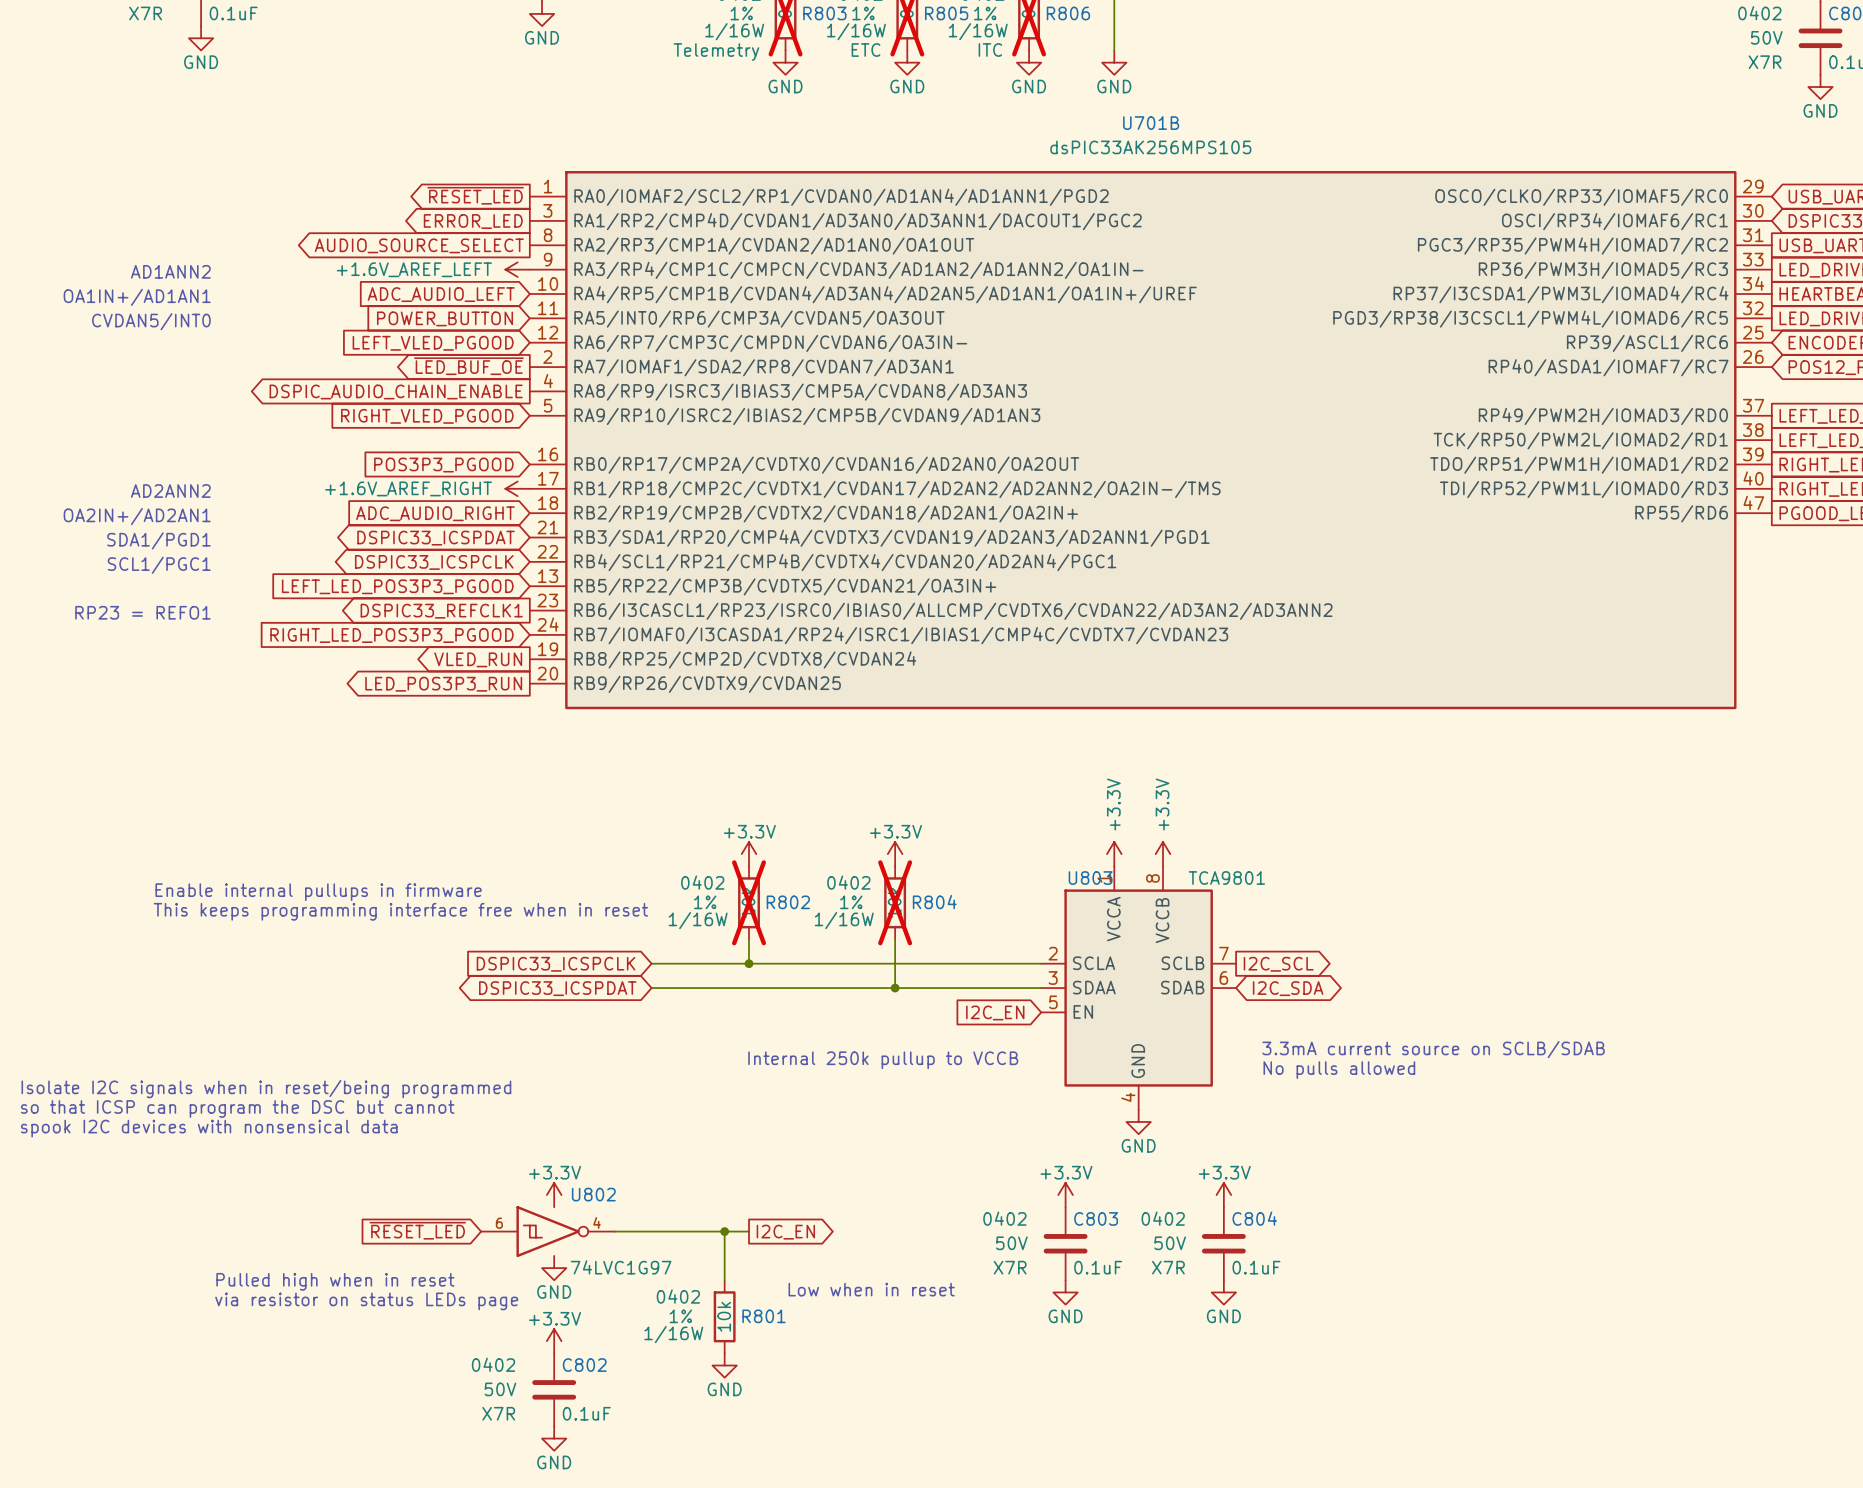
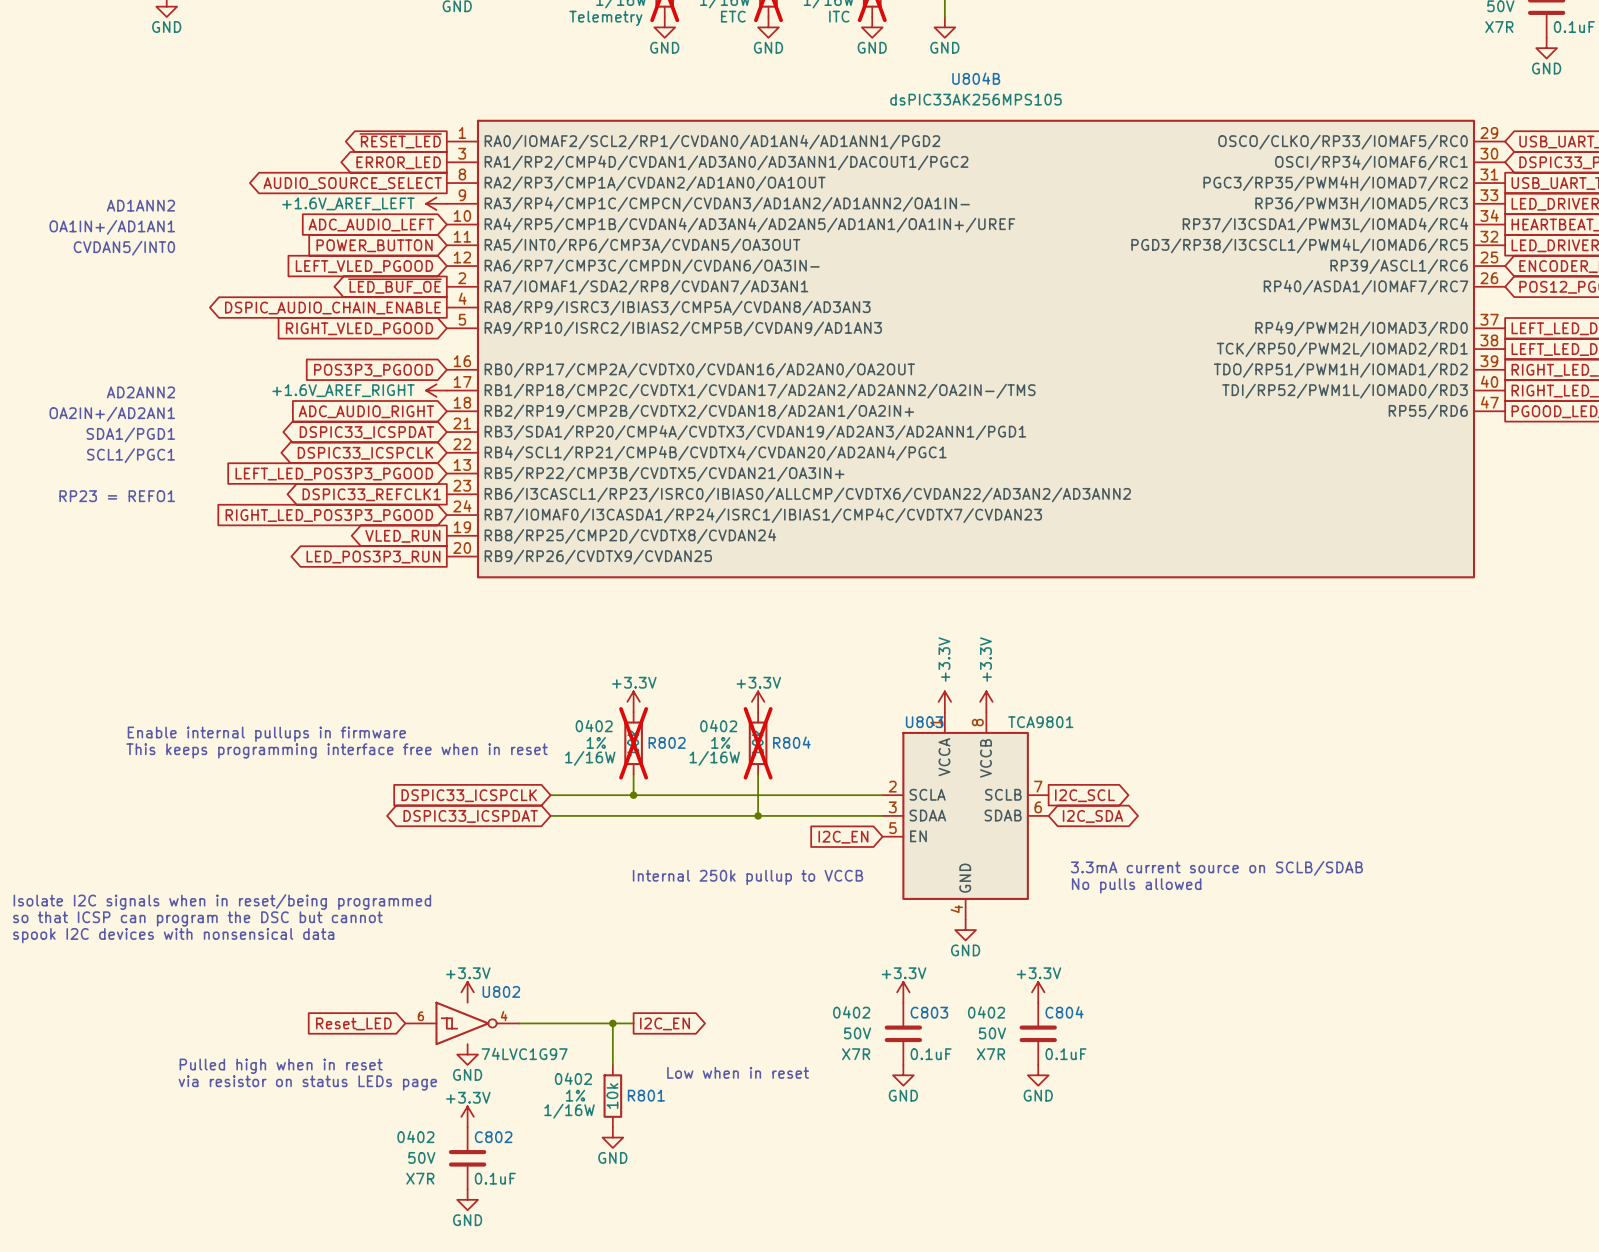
U701B name: U701B (1151, 123) -> U804B (976, 78)
global label: ~{RESET_LED} (417, 1230) -> Reset_LED (353, 1023)

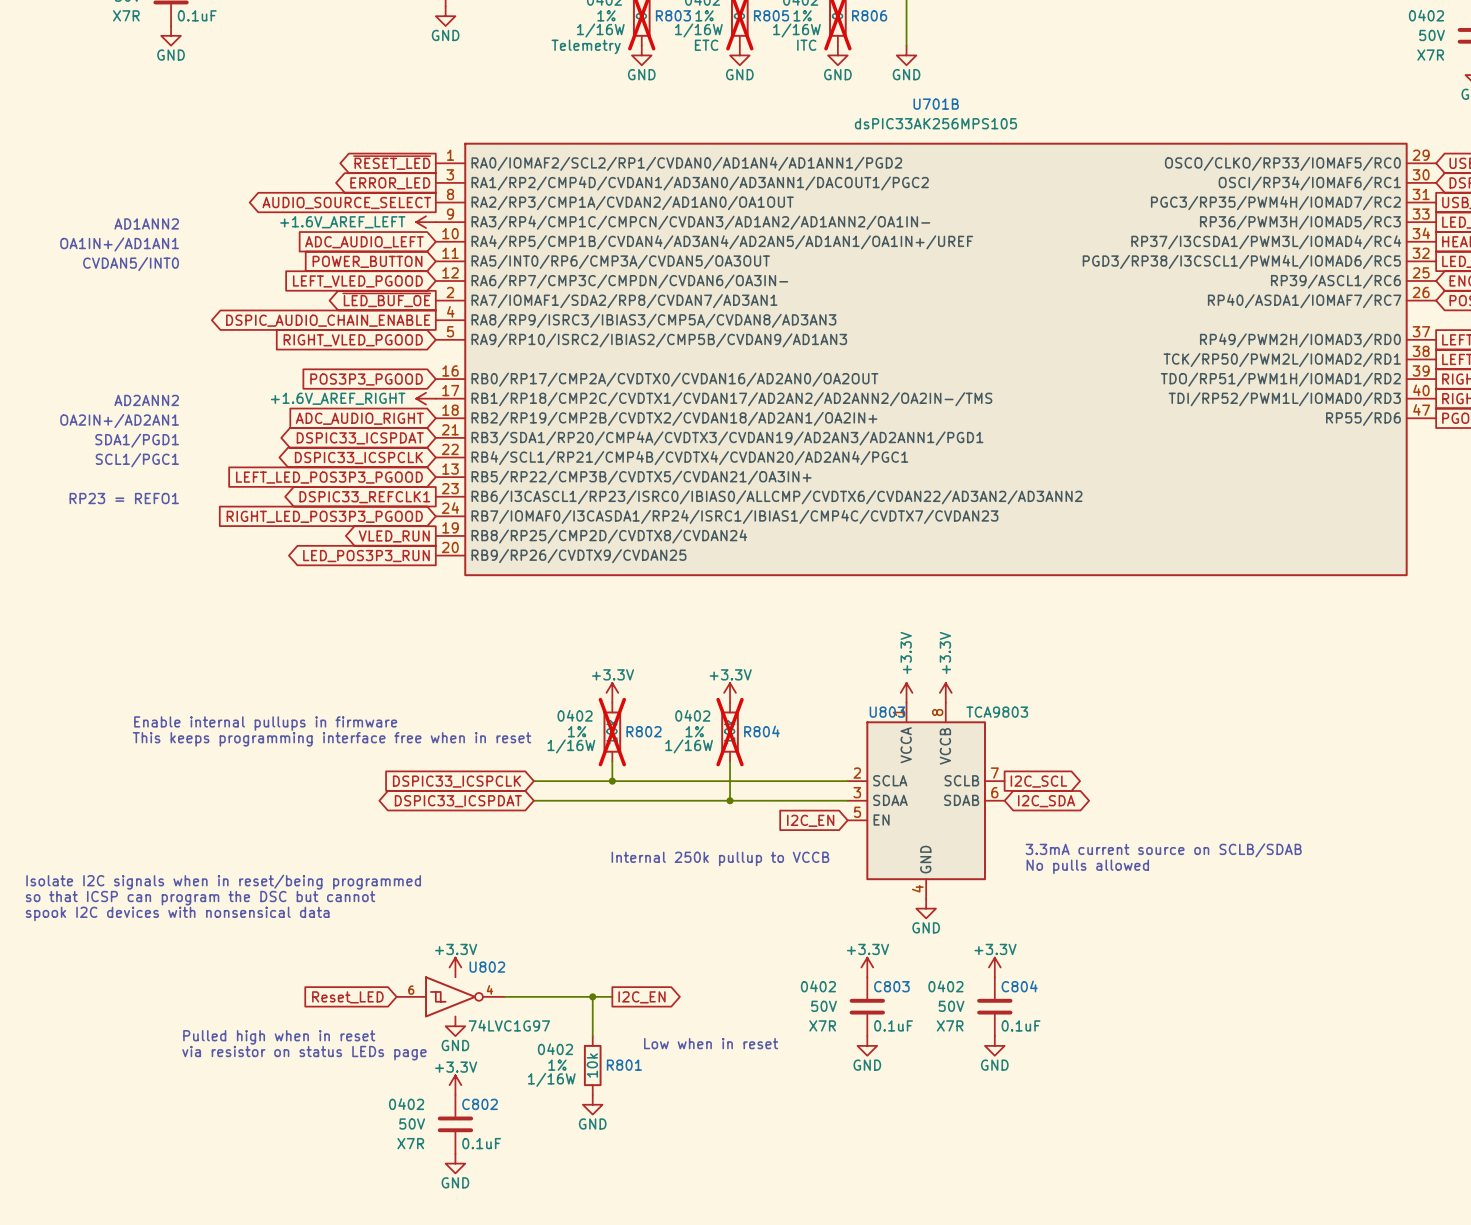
U804B name: U804B (976, 78) -> U701B (936, 104)
U803 value: TCA9801 (1040, 722) -> TCA9803 (997, 712)

